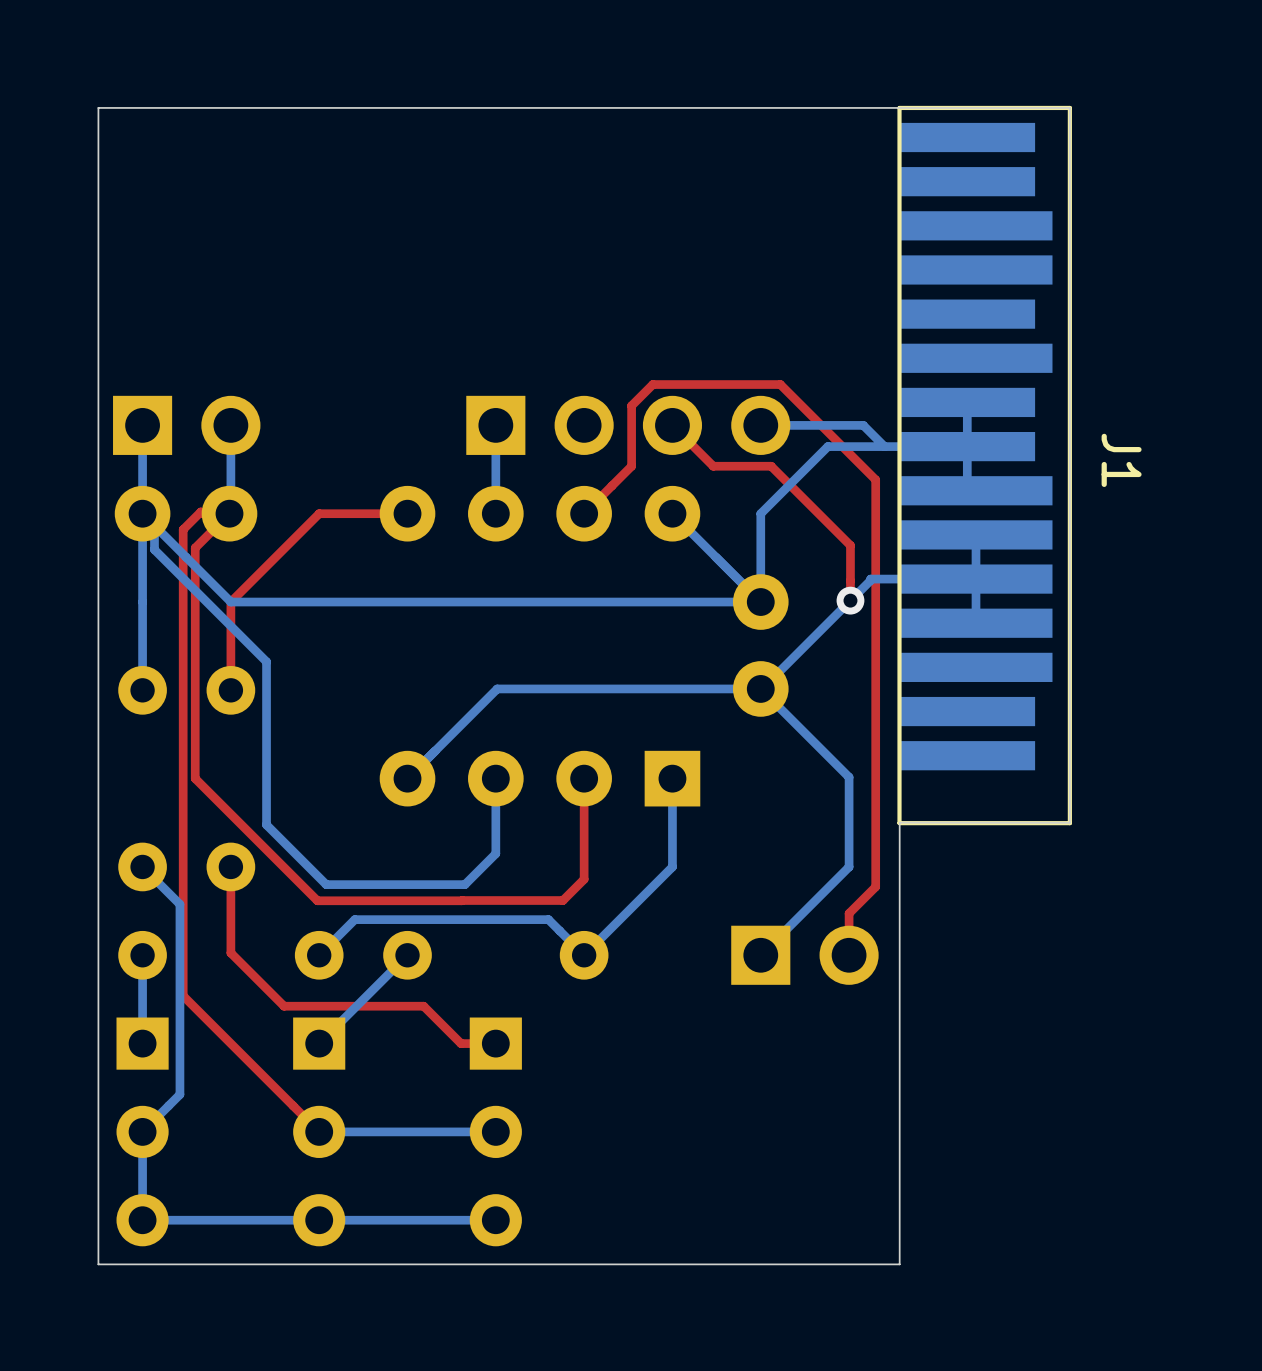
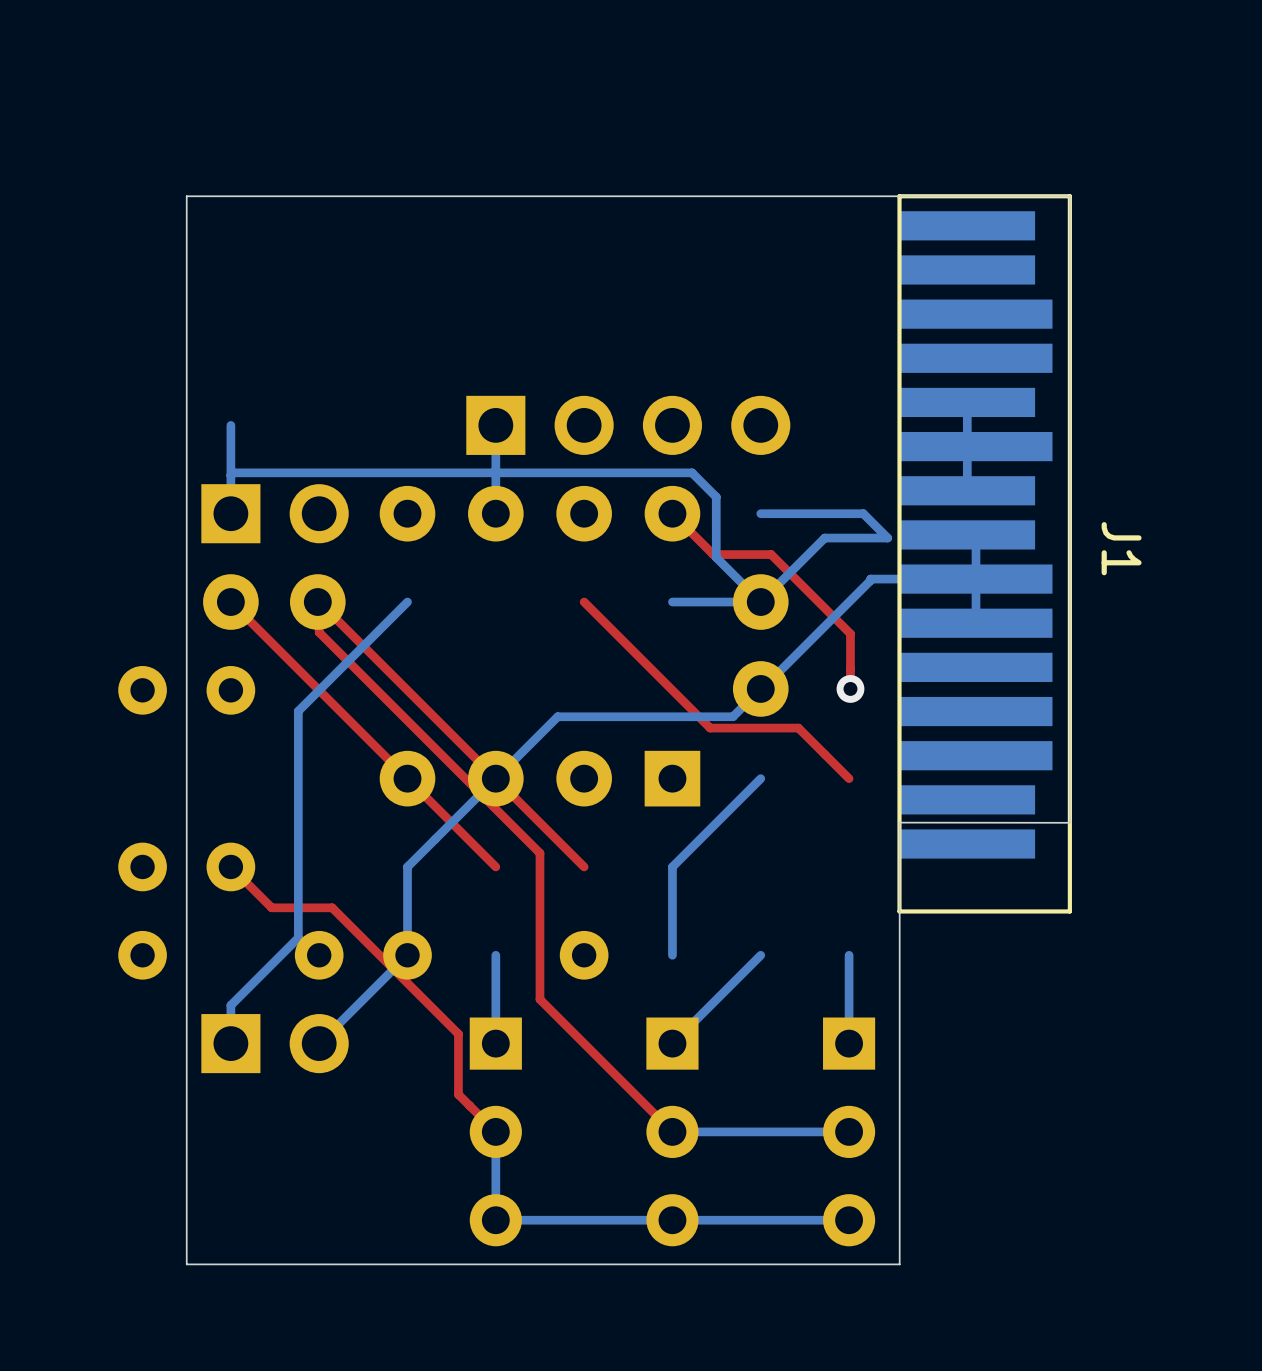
board edge: (1069, 196) (1069, 107) (98, 107) (98, 1264) (186, 1264) -> (1069, 196) (186, 196) (186, 1264)
bottom track: (142, 425) (142, 690) -> none
part position: (186, 425) -> (275, 513)
top track: (672, 425) (713, 466) (771, 466) (850, 545) (850, 600) -> (672, 513) (713, 554) (771, 554) (850, 633) (850, 688)
bottom track: (760, 425) (863, 425) (884, 446) -> none
bottom track: (967, 446) (827, 446) (760, 513) (760, 602) -> (760, 513) (863, 513) (887, 538) (824, 538) (760, 602)
J1 position: (984, 465) -> (984, 553)
bottom track: (142, 513) (230, 602) (672, 602) -> none
part position: (186, 513) -> (274, 602)
top track: (230, 513) (202, 513) (200, 511) (183, 529) (183, 995) (319, 1131) -> none
top track: (407, 513) (319, 513) (230, 602) (230, 690) -> none
top track: (584, 513) (631, 466) (631, 405) (652, 384) (780, 384) (875, 479) (875, 886) (849, 913) (849, 955) -> none
bottom track: (672, 513) (716, 557) -> (230, 475) (233, 472) (692, 472) (716, 497) (716, 557)
top track: (230, 515) (229, 513) (195, 547) (195, 778) (317, 900) (562, 900) (584, 879) (584, 778) -> none
bottom track: (154, 525) (154, 549) (266, 661) (266, 824) (326, 884) (464, 884) (495, 853) (495, 778) -> none
via position: (850, 600) -> (850, 688)
top track: none -> (230, 602) (495, 866)
bottom track: none -> (407, 602) (298, 711) (298, 937) (230, 1005) (230, 1043)
top track: none -> (584, 602) (710, 728) (798, 728) (849, 778)
bottom track: none -> (760, 688) (732, 716) (557, 716) (407, 866) (407, 955)
bottom track: (407, 778) (497, 688) (760, 688) (849, 777) (849, 866) (760, 955) -> (672, 1043) (760, 955)
bottom track: (672, 778) (672, 866) (584, 955) (548, 919) (354, 919) (319, 955) -> none
bottom track: none -> (760, 778) (672, 866) (672, 955)
bottom track: (142, 866) (179, 904) (179, 1094) (142, 1131) (142, 1220) (495, 1220) -> none
top track: (230, 866) (230, 953) (284, 1006) (423, 1006) (461, 1043) (495, 1043) -> (230, 866) (271, 907) (332, 907) (458, 1034) (458, 1094) (495, 1131)
top track: none -> (584, 866) (317, 602) (319, 632) (539, 853) (539, 999) (672, 1131)
bottom track: (142, 955) (142, 1043) -> (495, 955) (495, 1043)
part: (804, 955) -> none
bottom track: none -> (849, 955) (849, 1043)
part: none -> (275, 1043)
part: (142, 1131) -> none
part: (319, 1131) -> none
bottom track: (495, 1131) (319, 1131) -> (495, 1131) (495, 1220) (849, 1220)
part: none -> (672, 1131)
bottom track: none -> (849, 1131) (672, 1131)
part: none -> (849, 1131)

